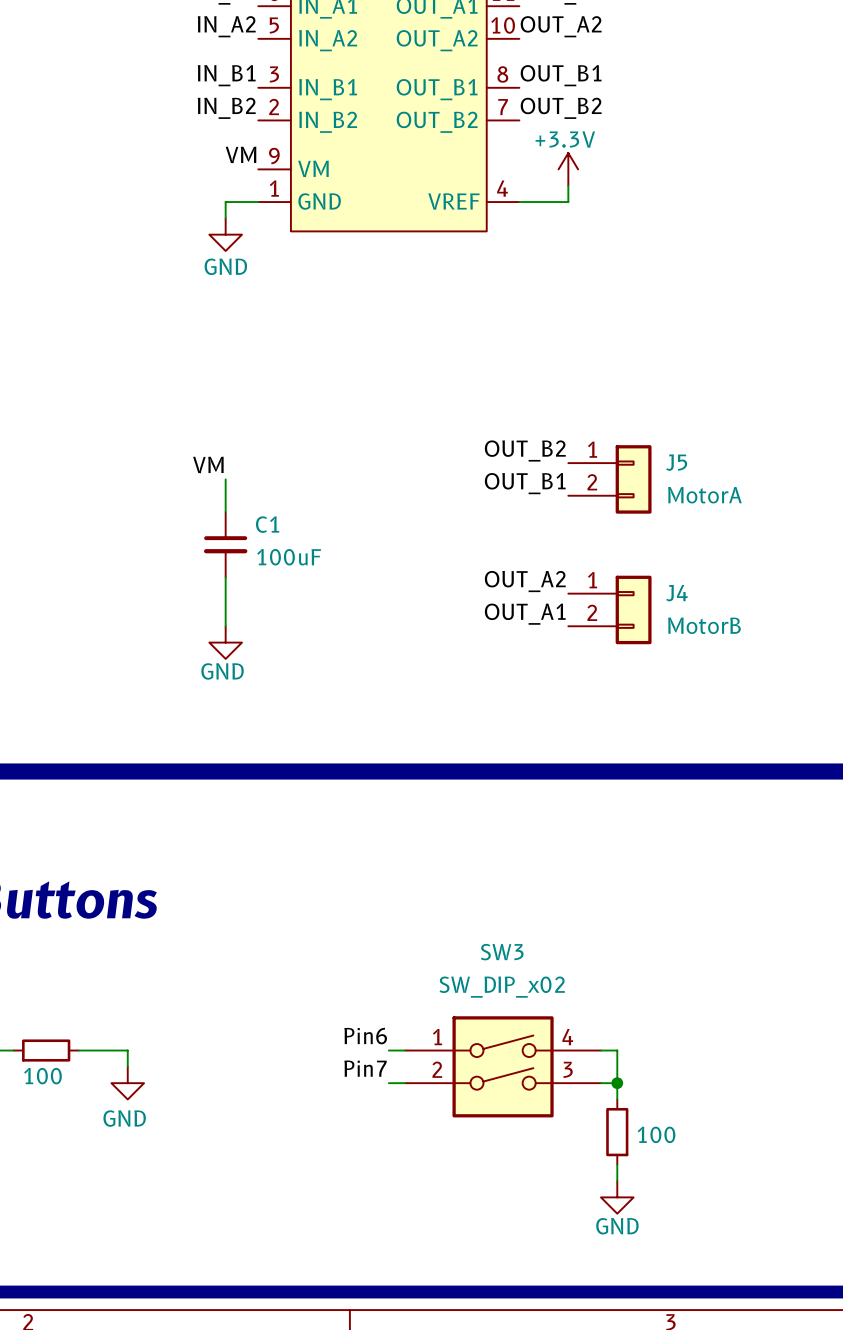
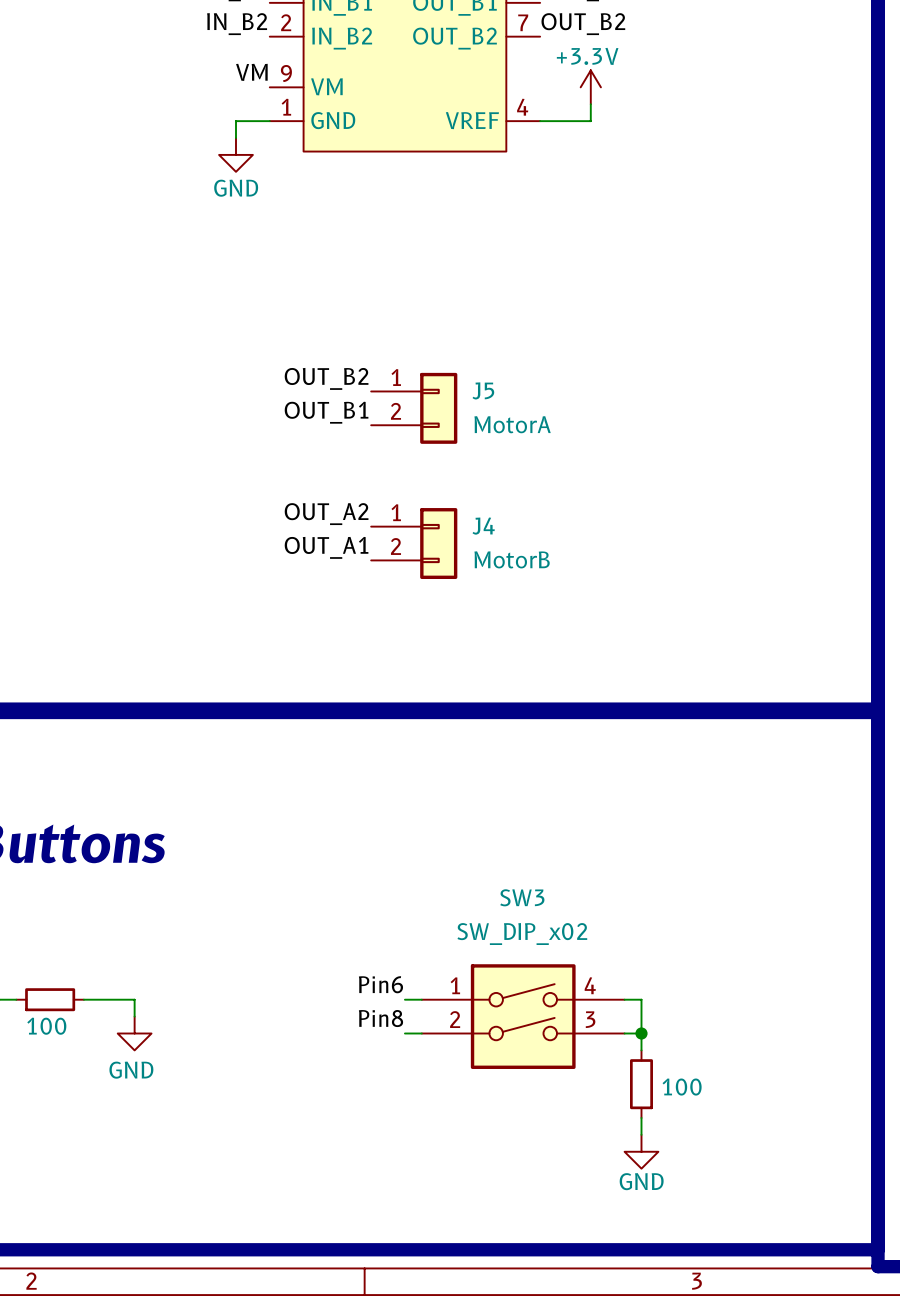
label position: OUT_B2 (525, 450) -> OUT_B2 (326, 378)
label: VM (208, 464) -> none
wire: (225, 479) (225, 512) -> none
J5 position: (609, 479) -> (414, 408)
label position: OUT_B1 (525, 483) -> OUT_B1 (326, 412)
C1: 100uF (225, 544) -> none
wire: (225, 577) (225, 626) -> none
label position: OUT_A2 (525, 581) -> OUT_A2 (326, 514)
J4 position: (609, 609) -> (414, 543)
label position: OUT_A1 (525, 614) -> OUT_A1 (326, 547)
power symbol: GND (225, 642) -> none
label: Pin7 (365, 1068) -> Pin8 (380, 1018)

